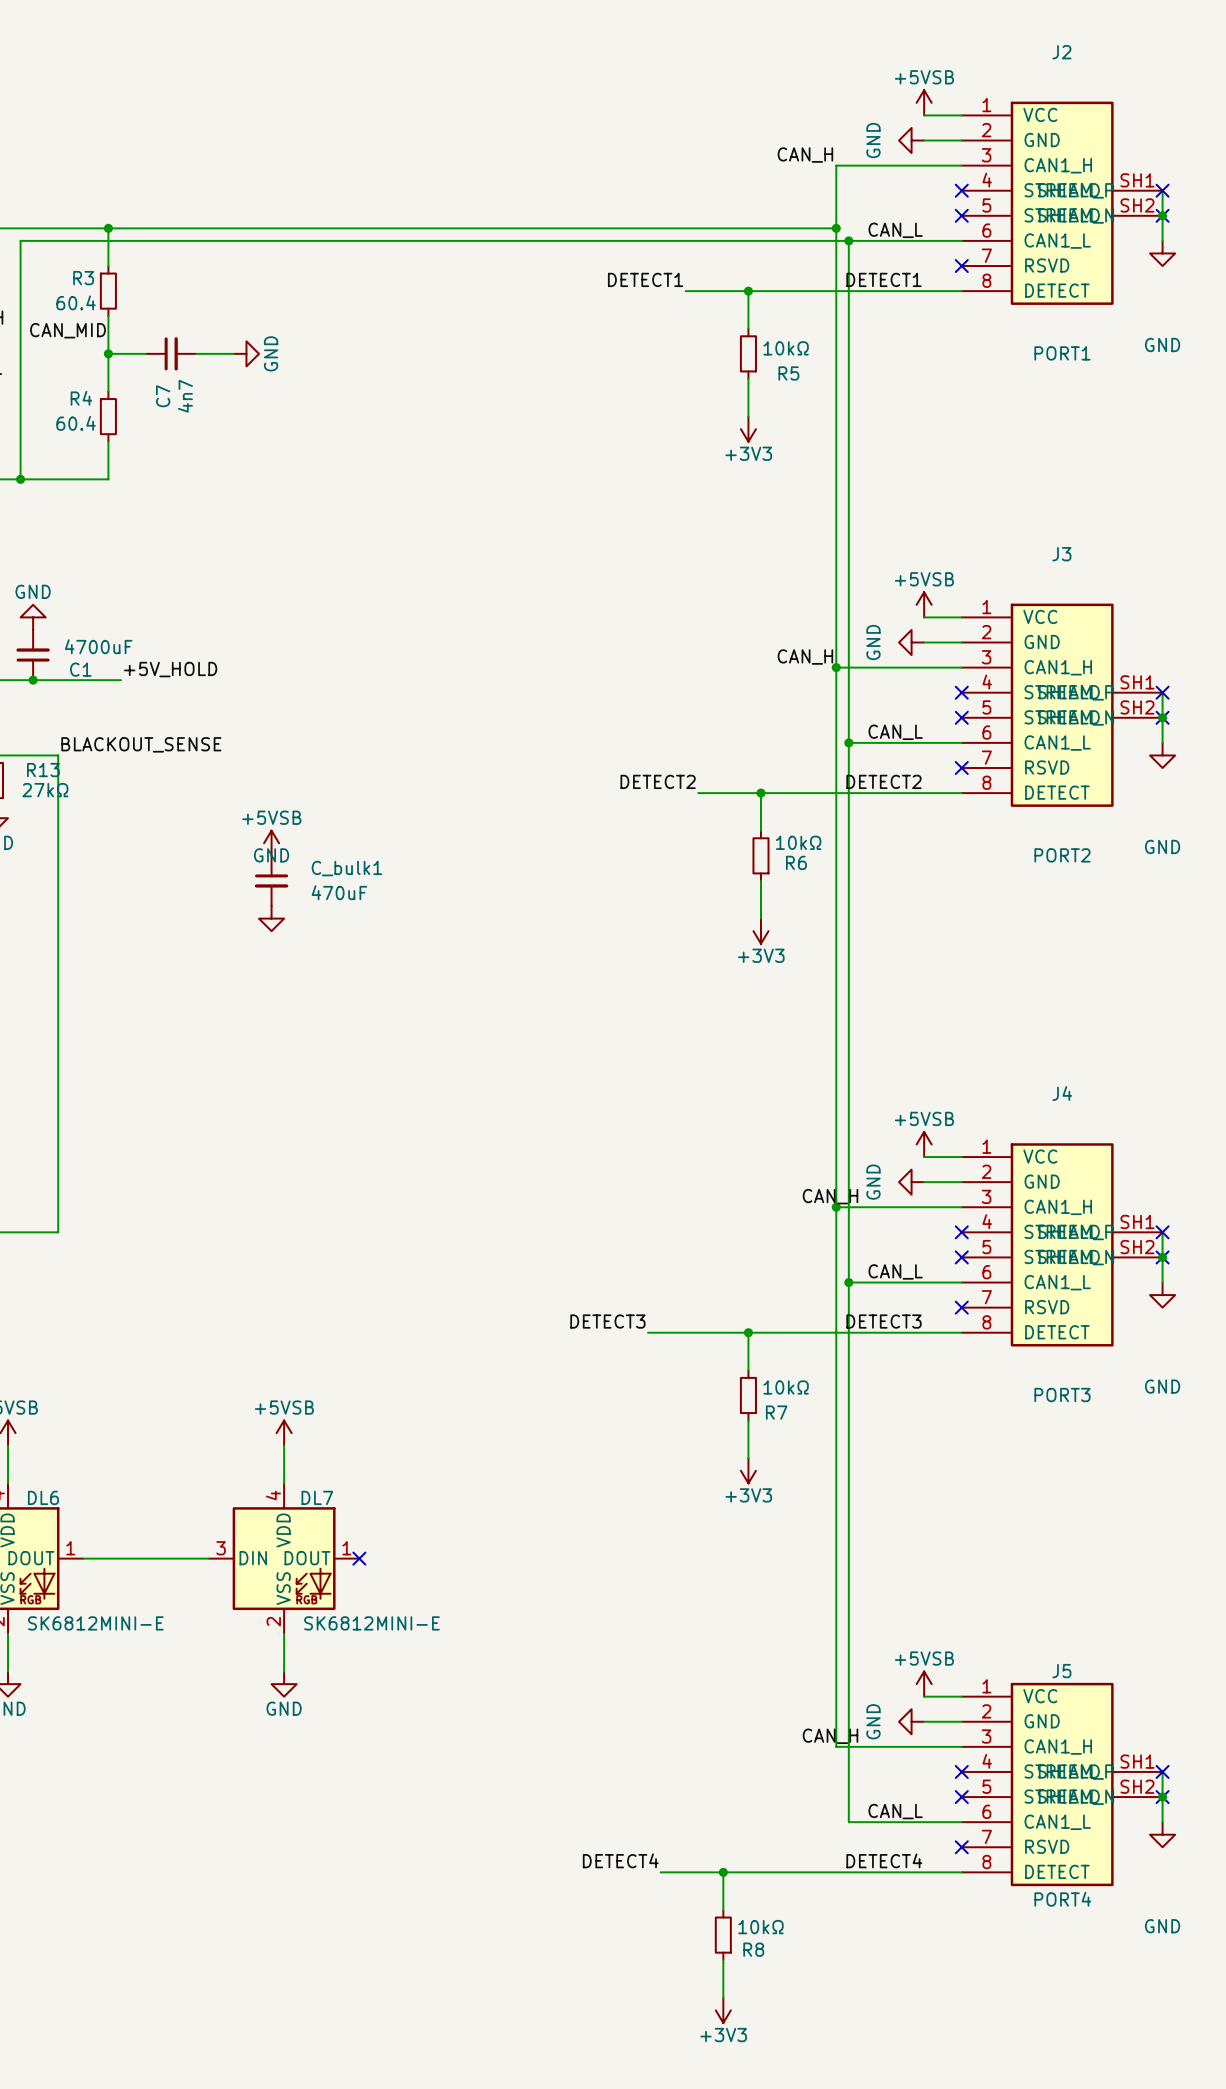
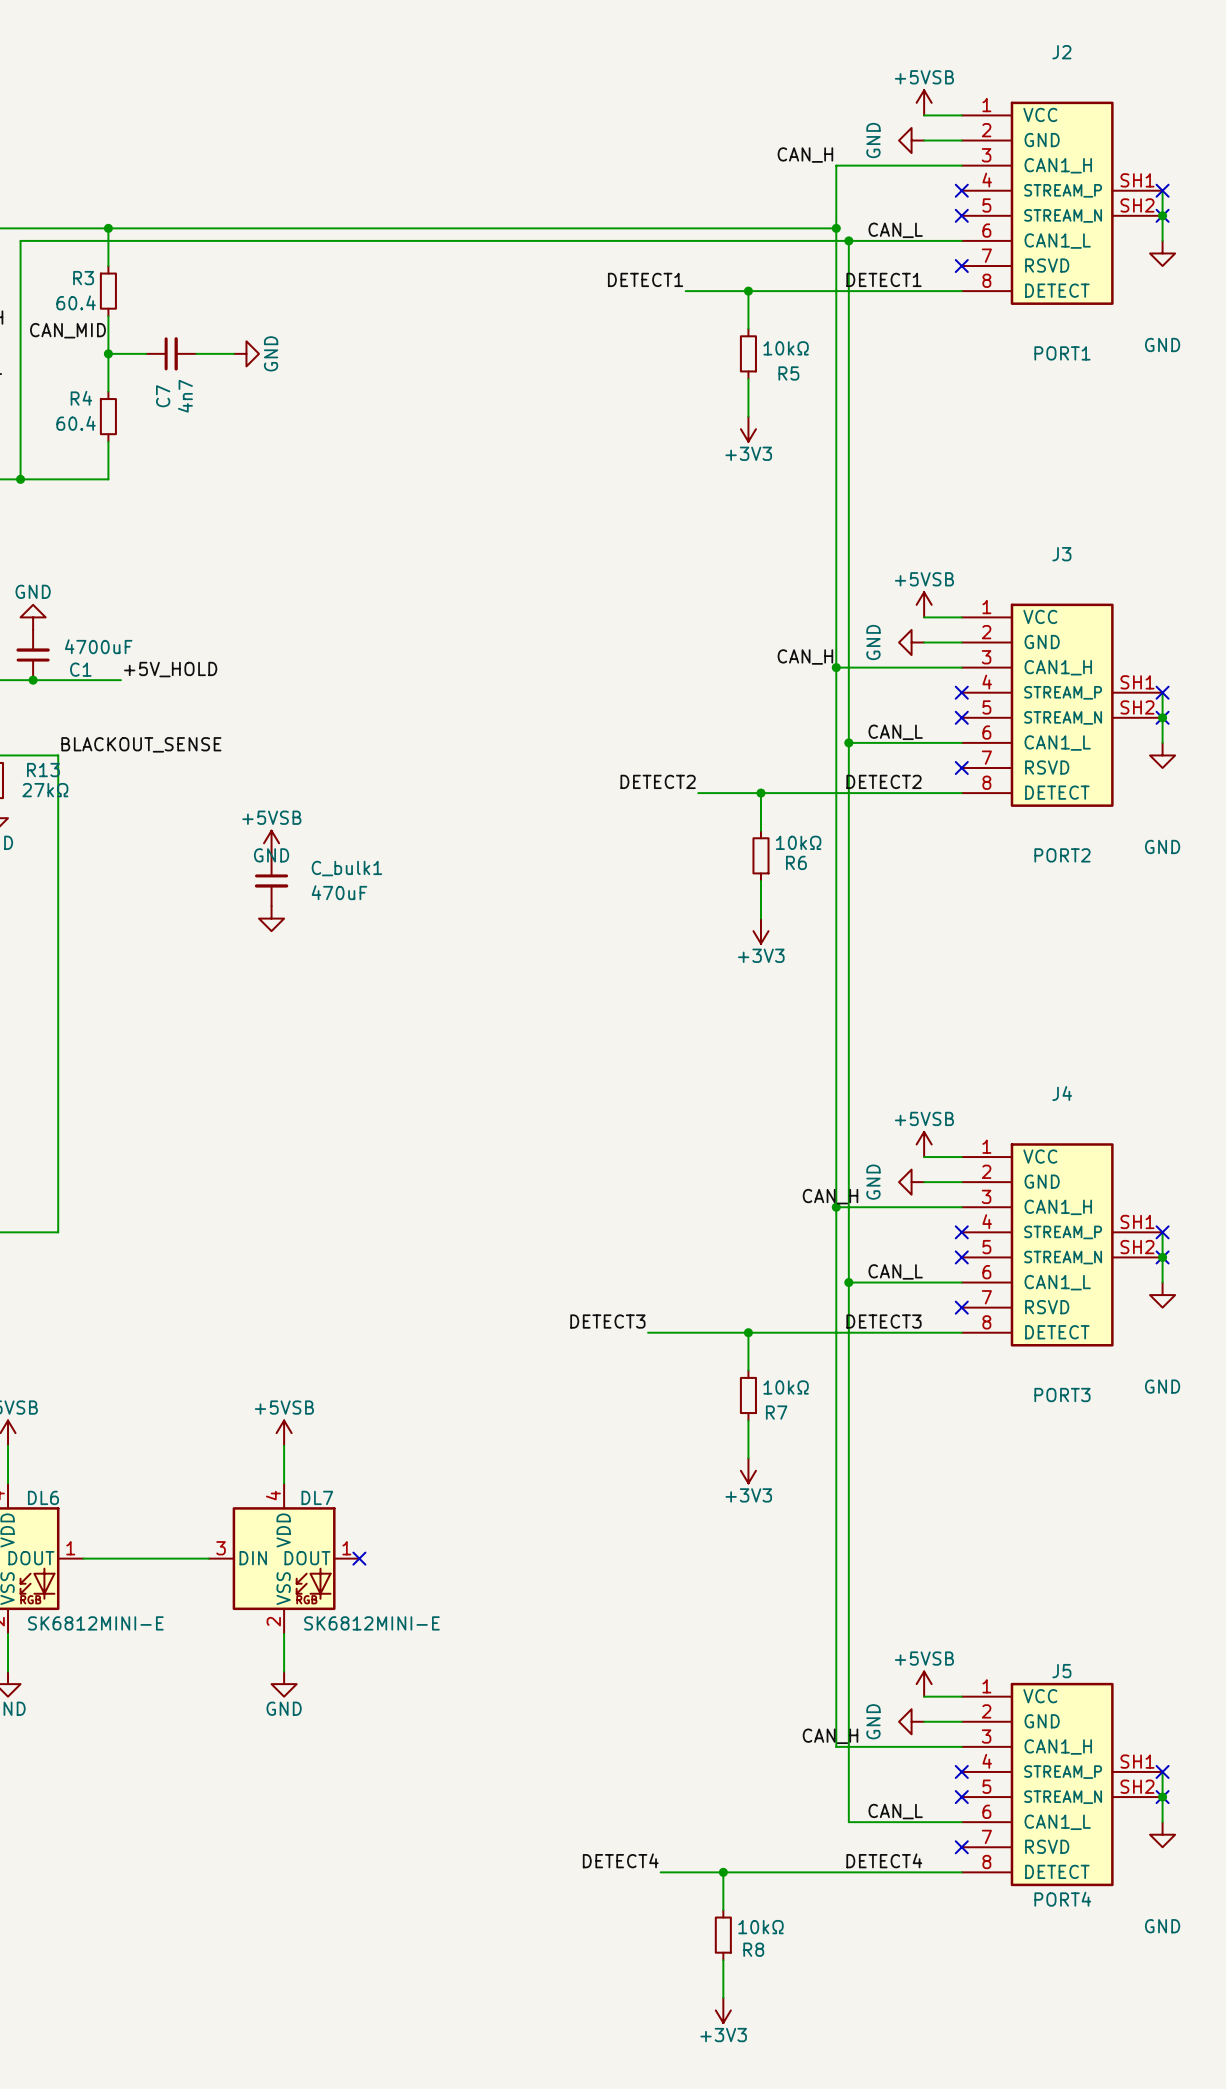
J2 symbol: [961, 101, 1163, 305] -> [961, 101, 1163, 305]
J3 symbol: [961, 603, 1163, 807] -> [961, 603, 1163, 807]
J4 symbol: [961, 1143, 1163, 1347] -> [961, 1143, 1163, 1347]
J5 symbol: [961, 1682, 1163, 1887] -> [961, 1682, 1163, 1887]

